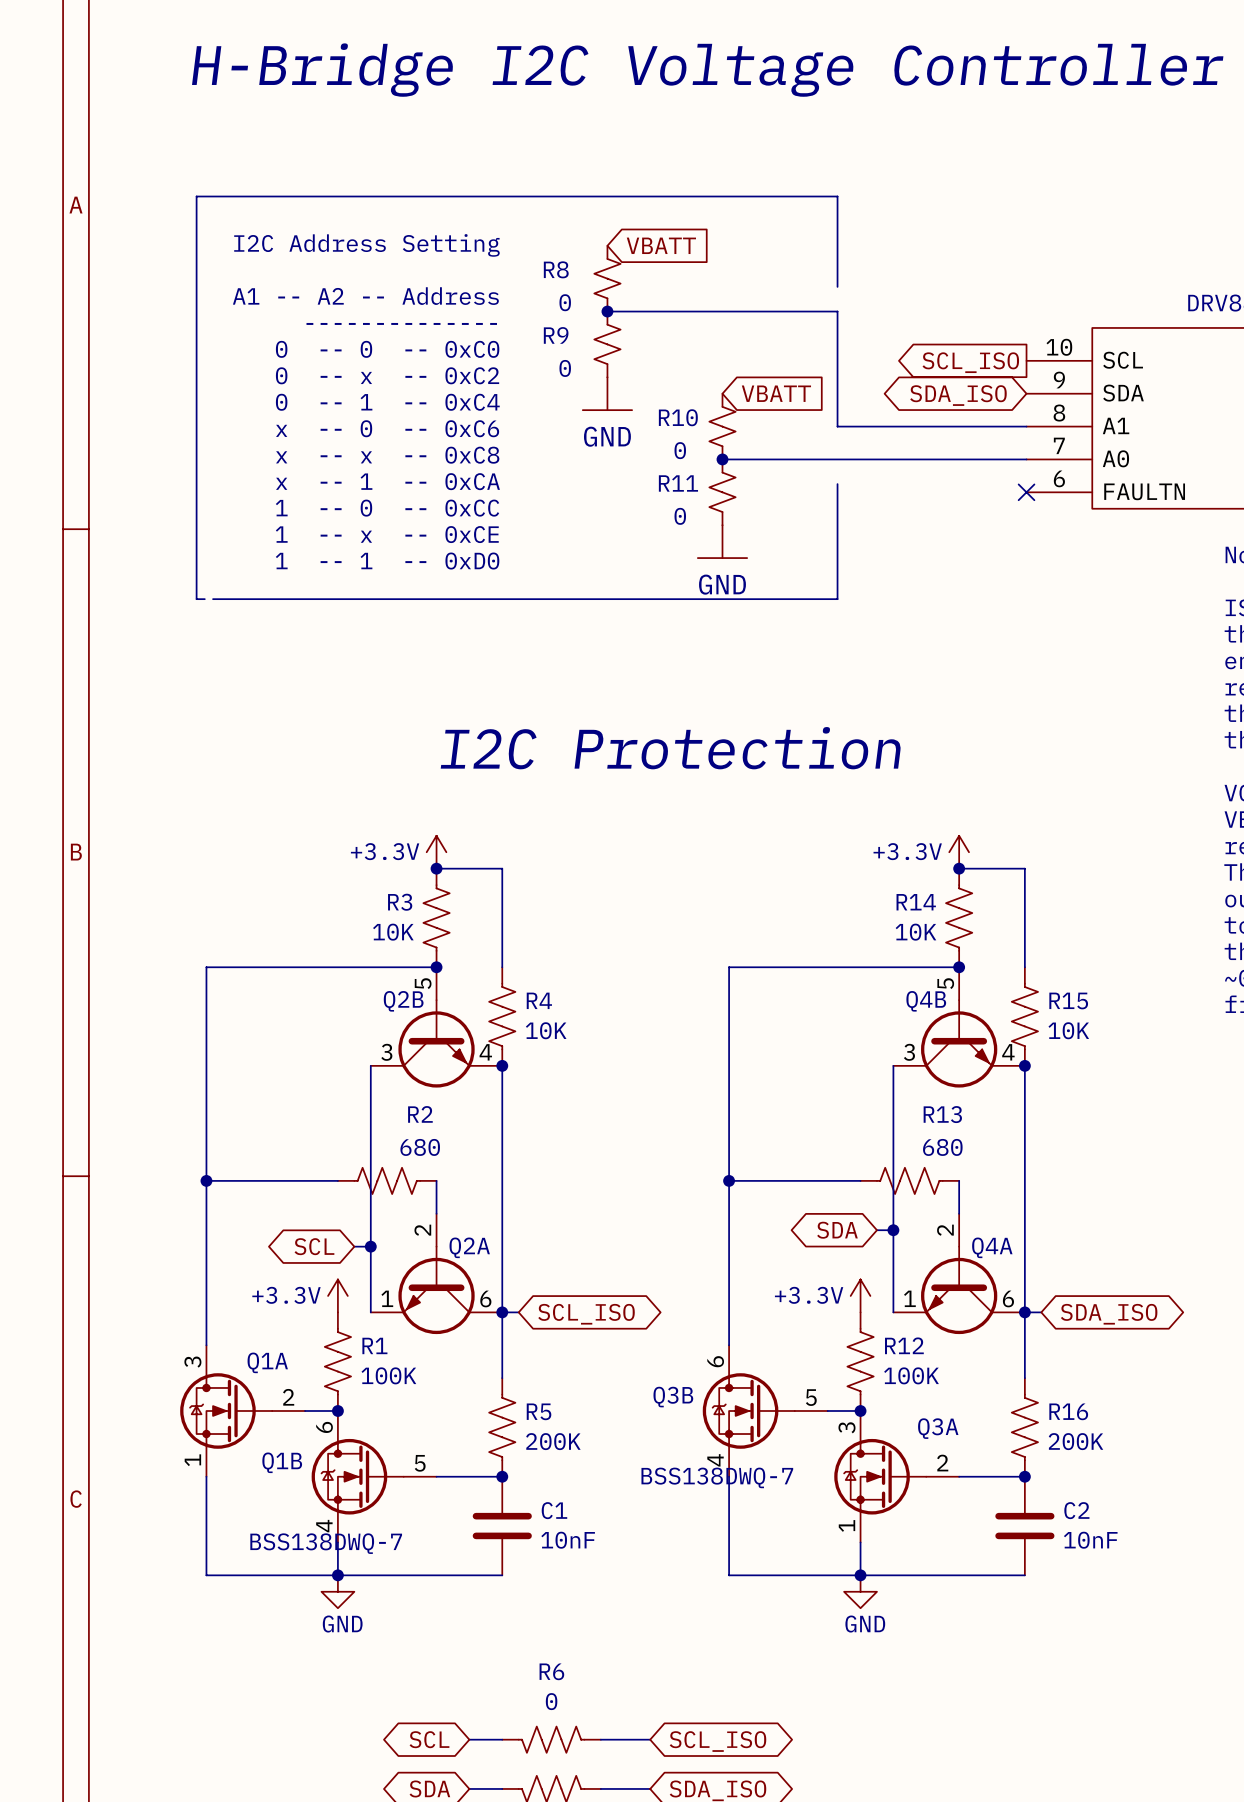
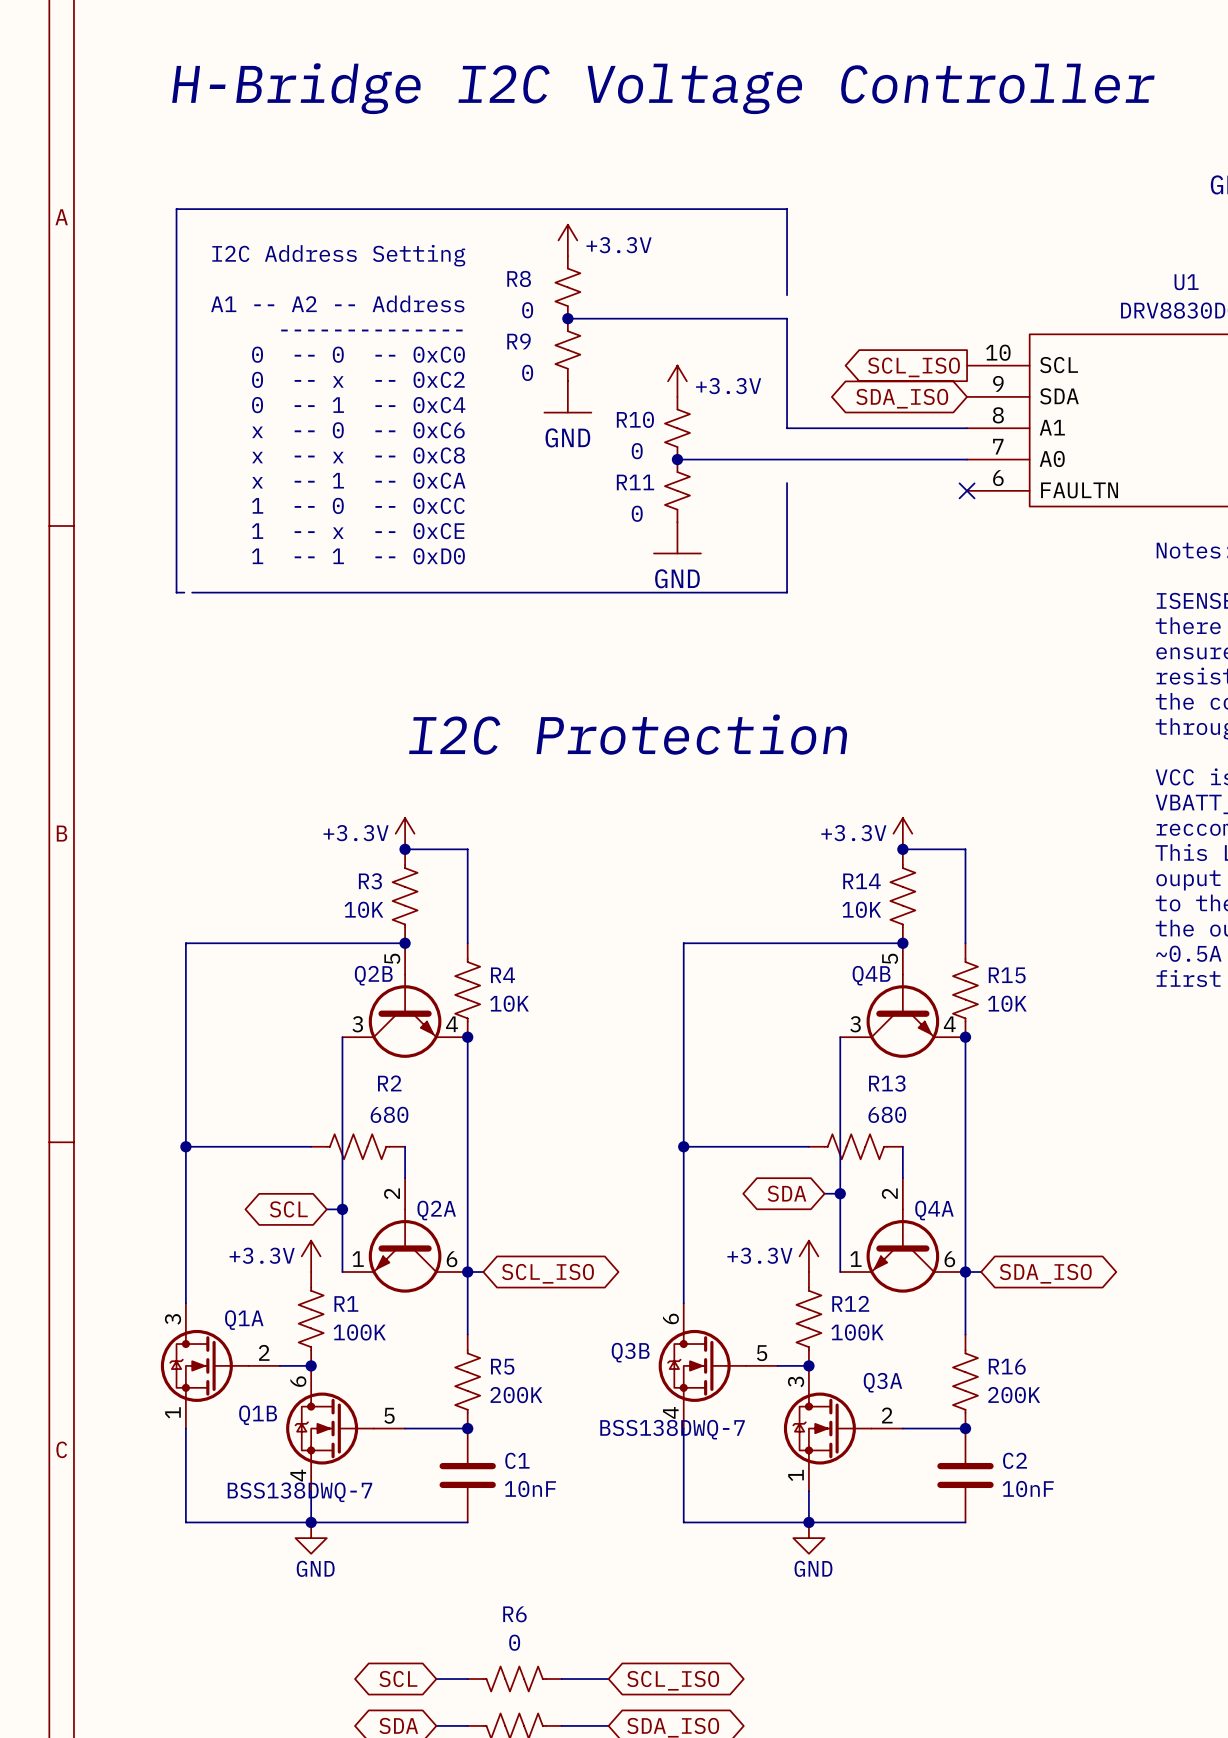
power symbol: none -> +3.3V (567, 240)
global label: VBATT (661, 245) -> none
power symbol: none -> +3.3V (677, 381)
global label: VBATT (776, 393) -> none

